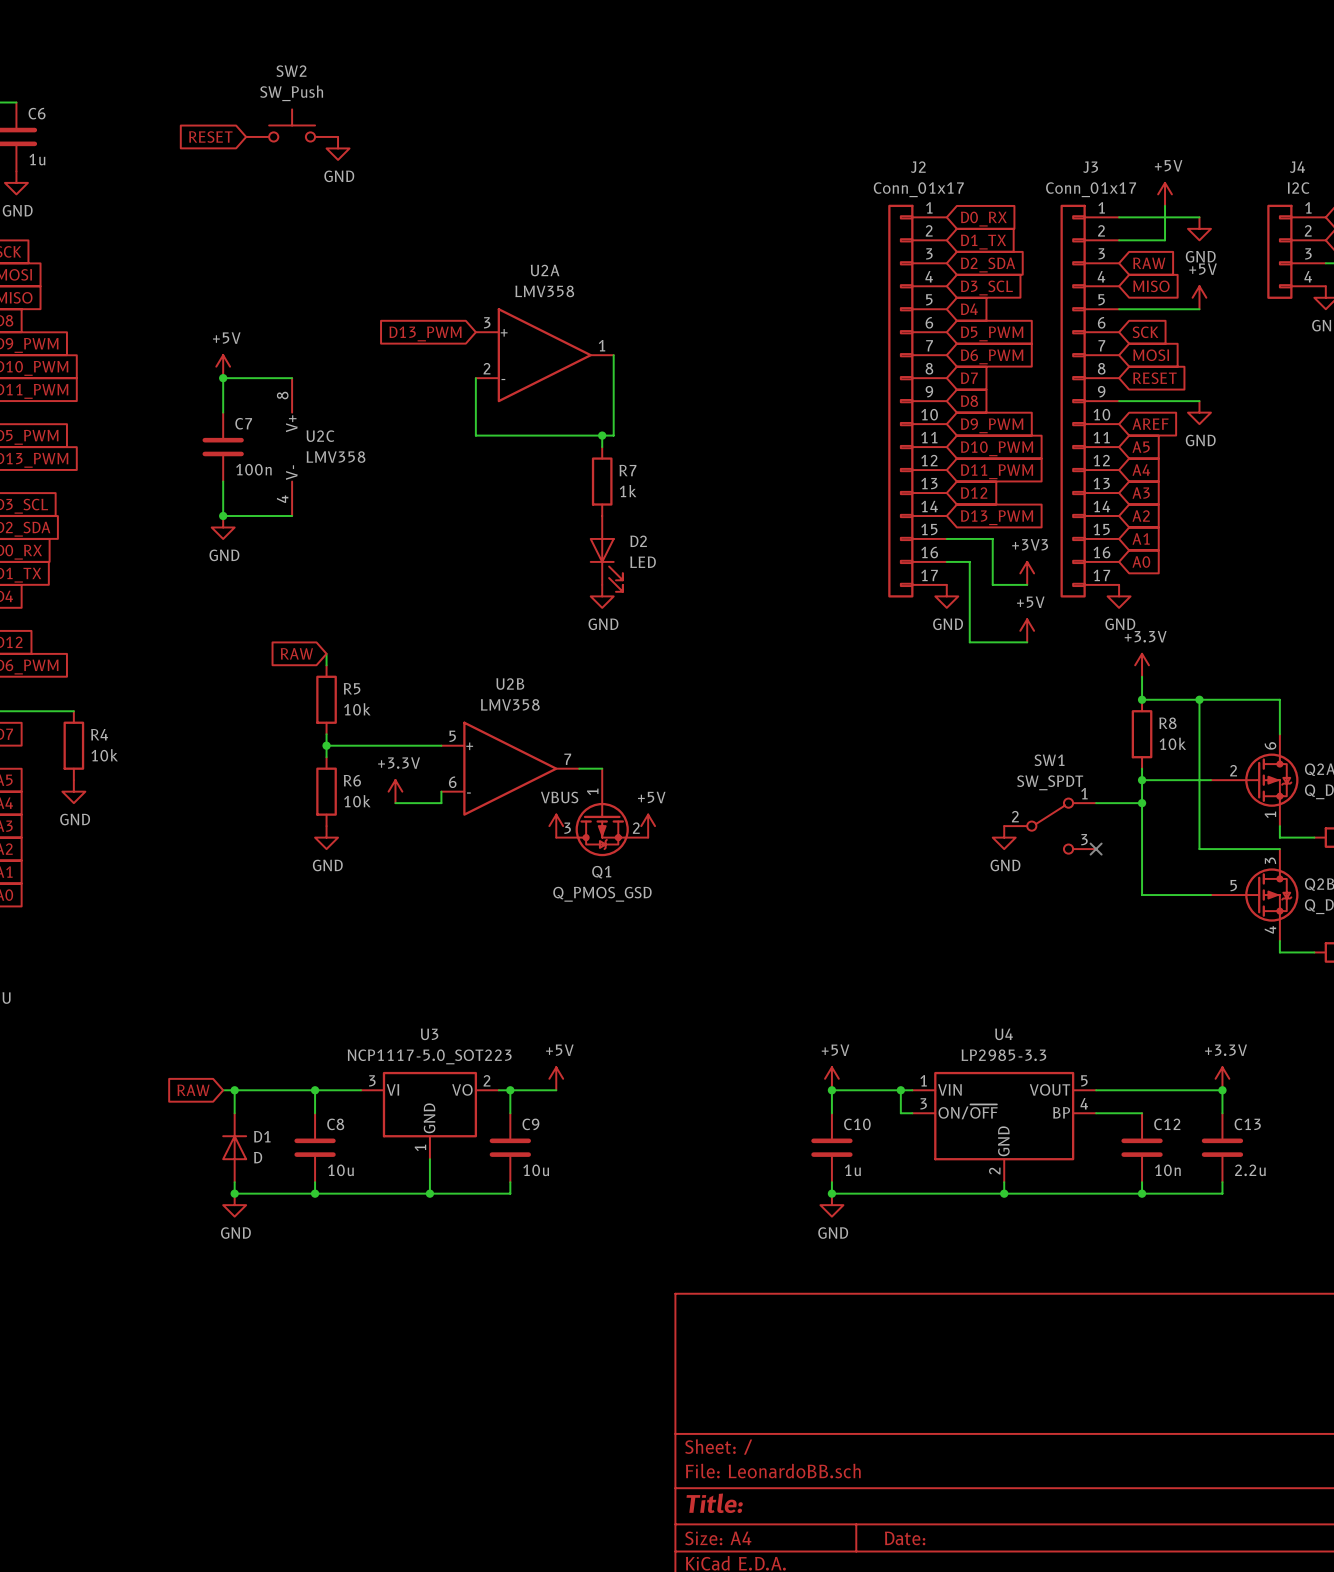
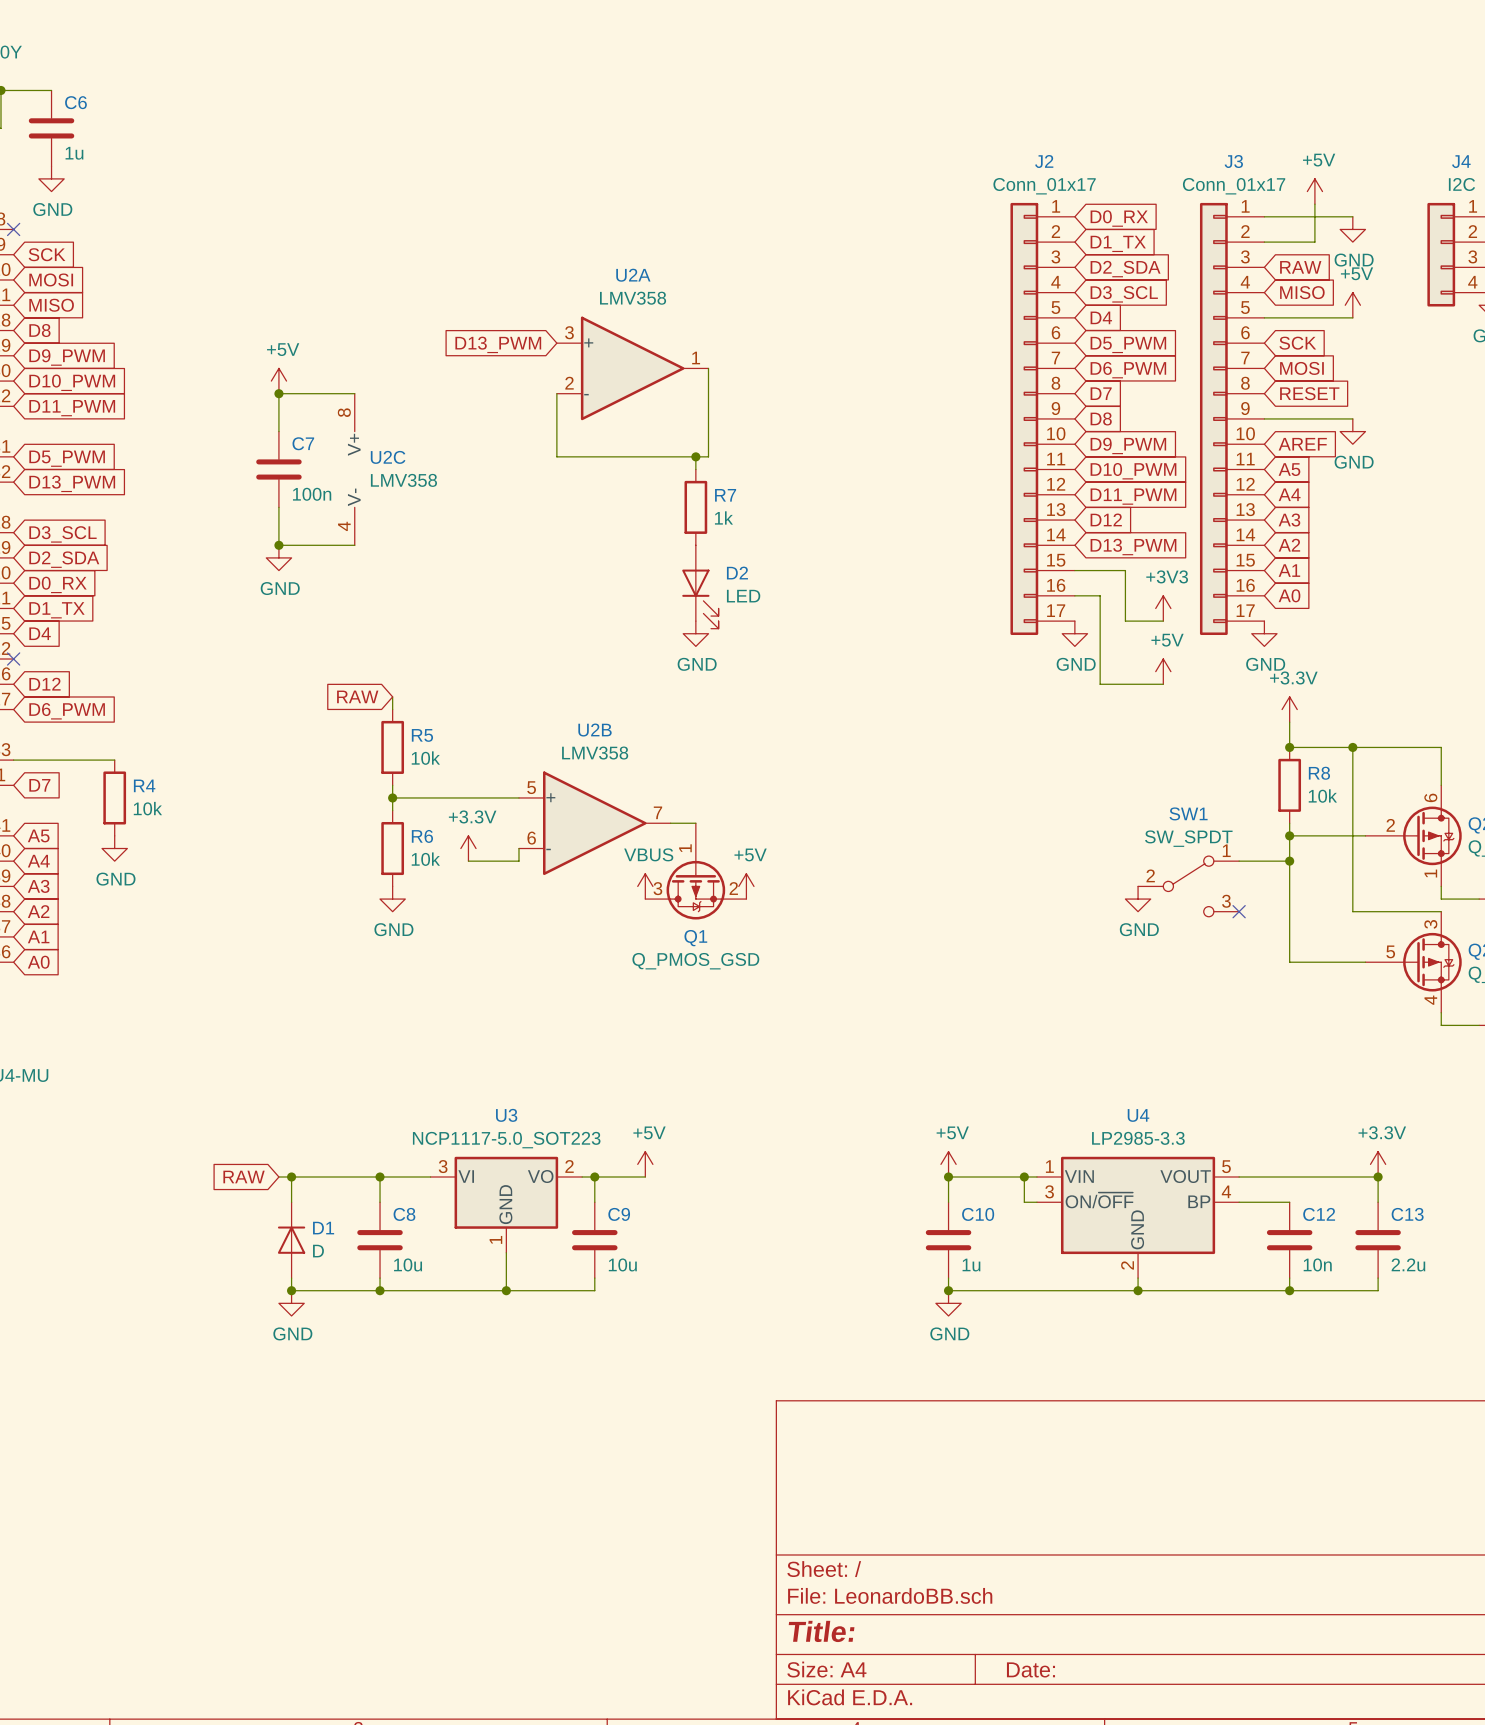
SW2: SW_Push (292, 125) -> none
global label: RESET (210, 137) -> none
power symbol: GND (338, 148) -> none

